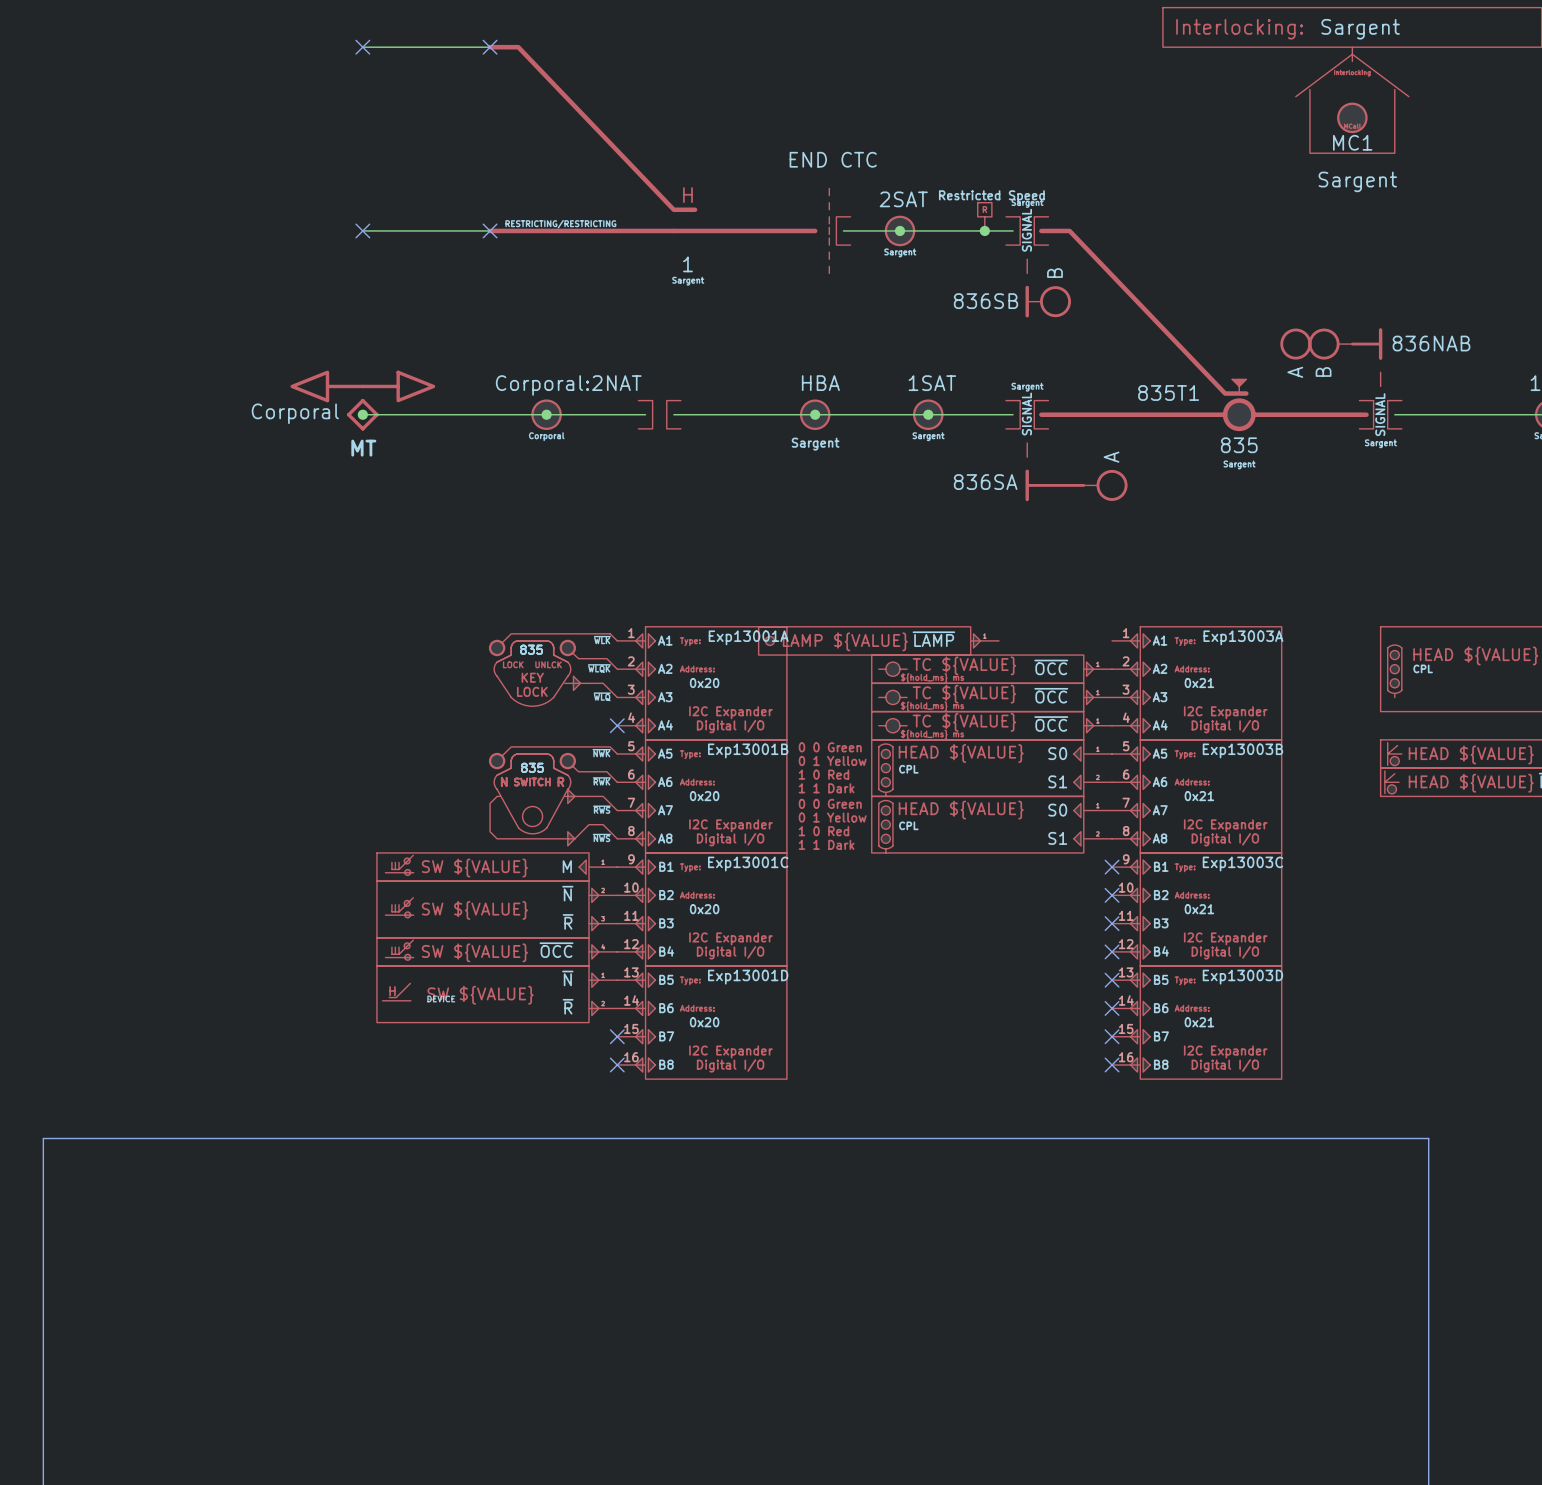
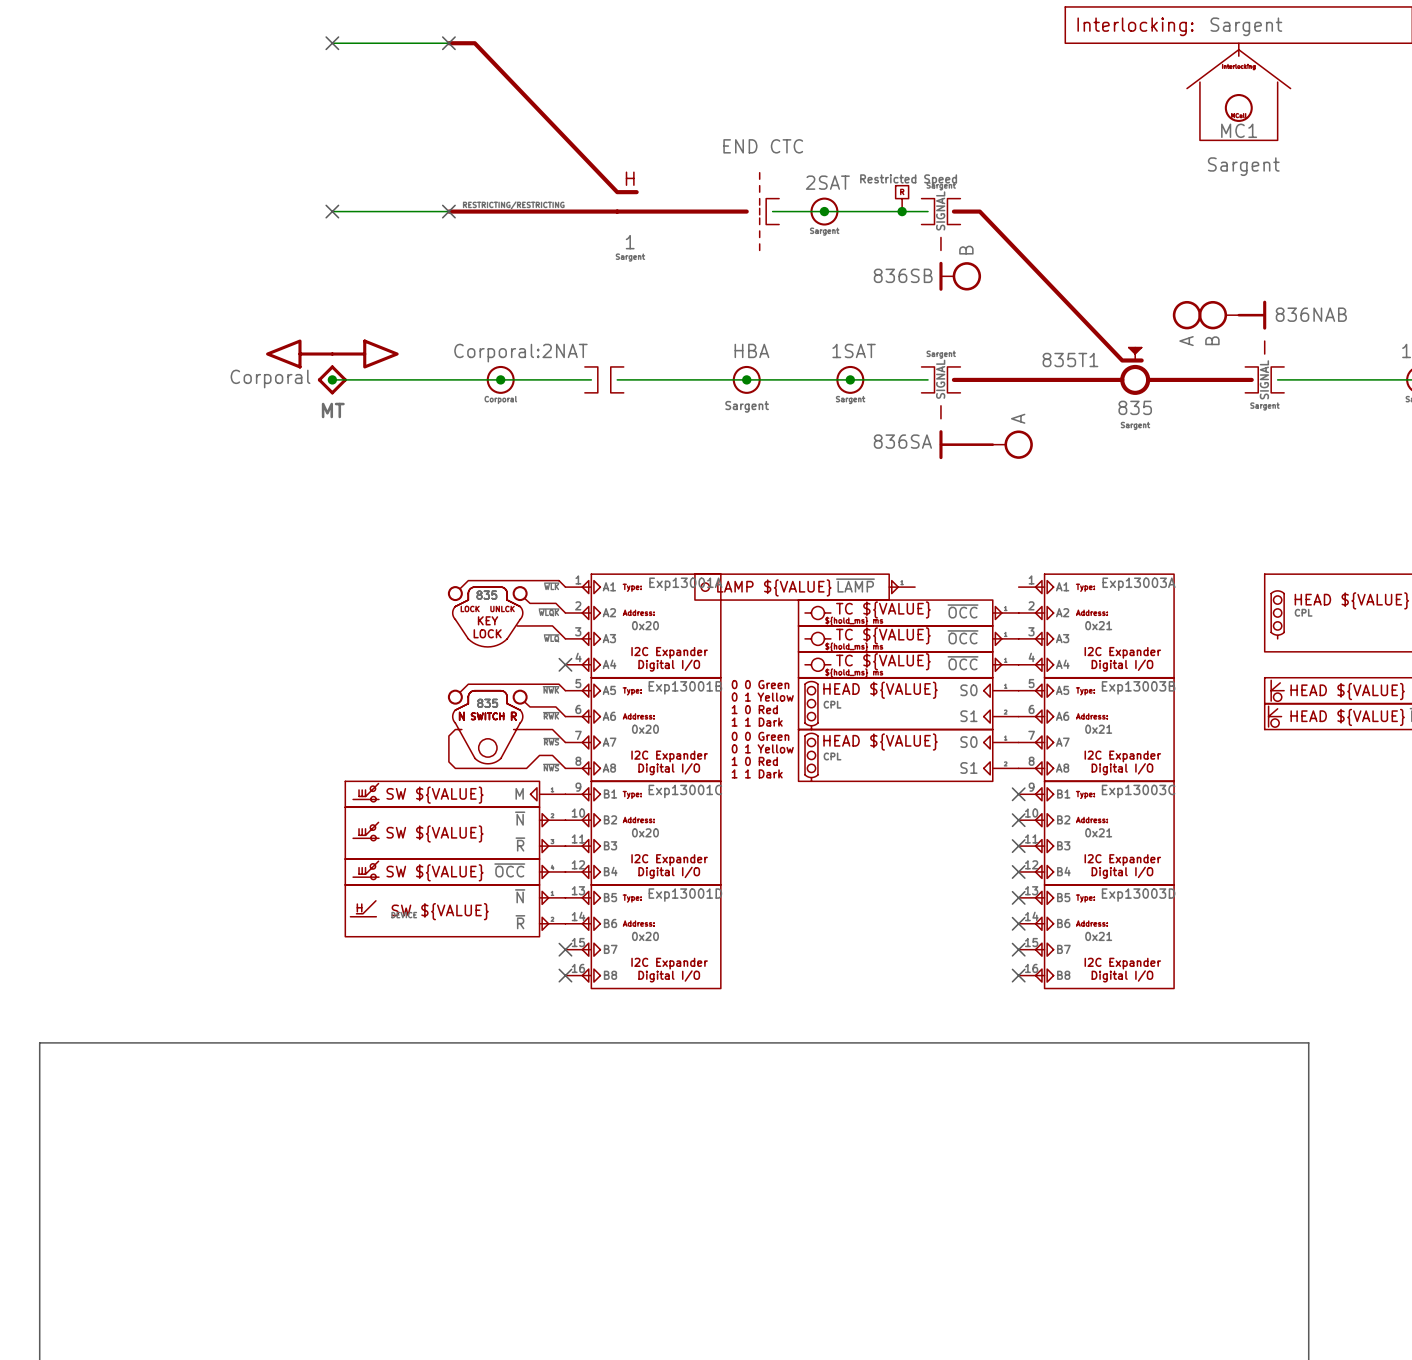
part symbol: [494, 640, 618, 707] -> [452, 587, 566, 647]
part symbol: [490, 754, 618, 846] -> [448, 690, 566, 769]

